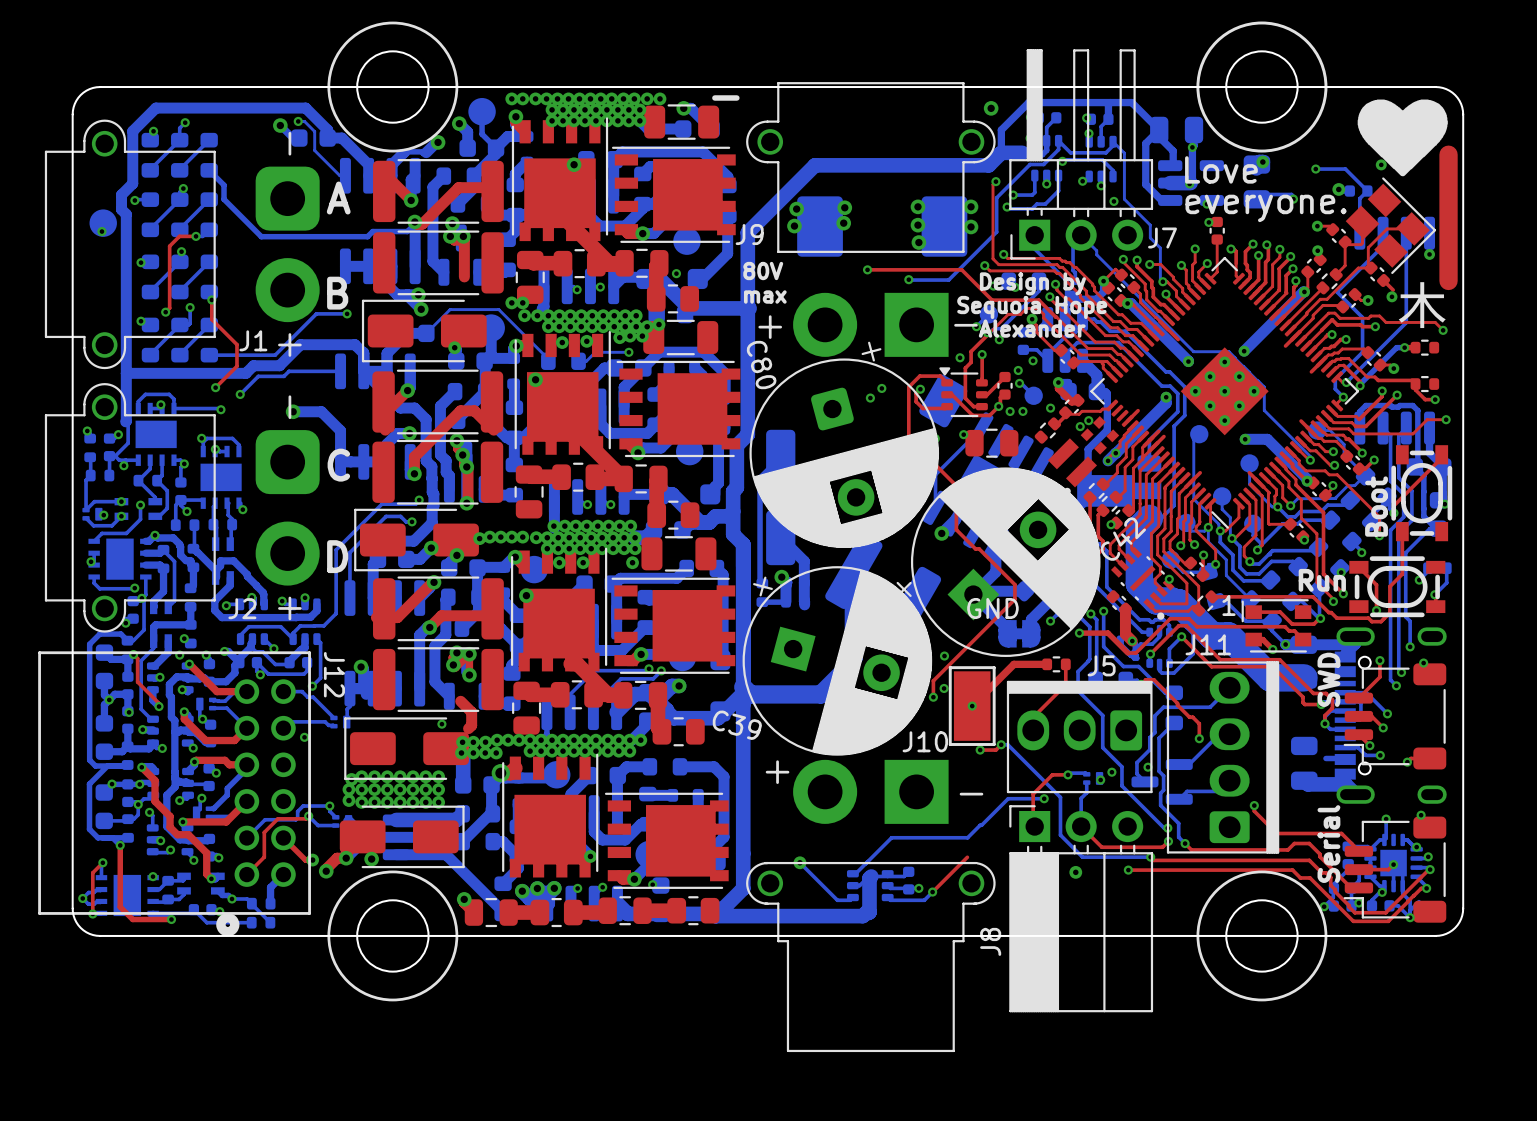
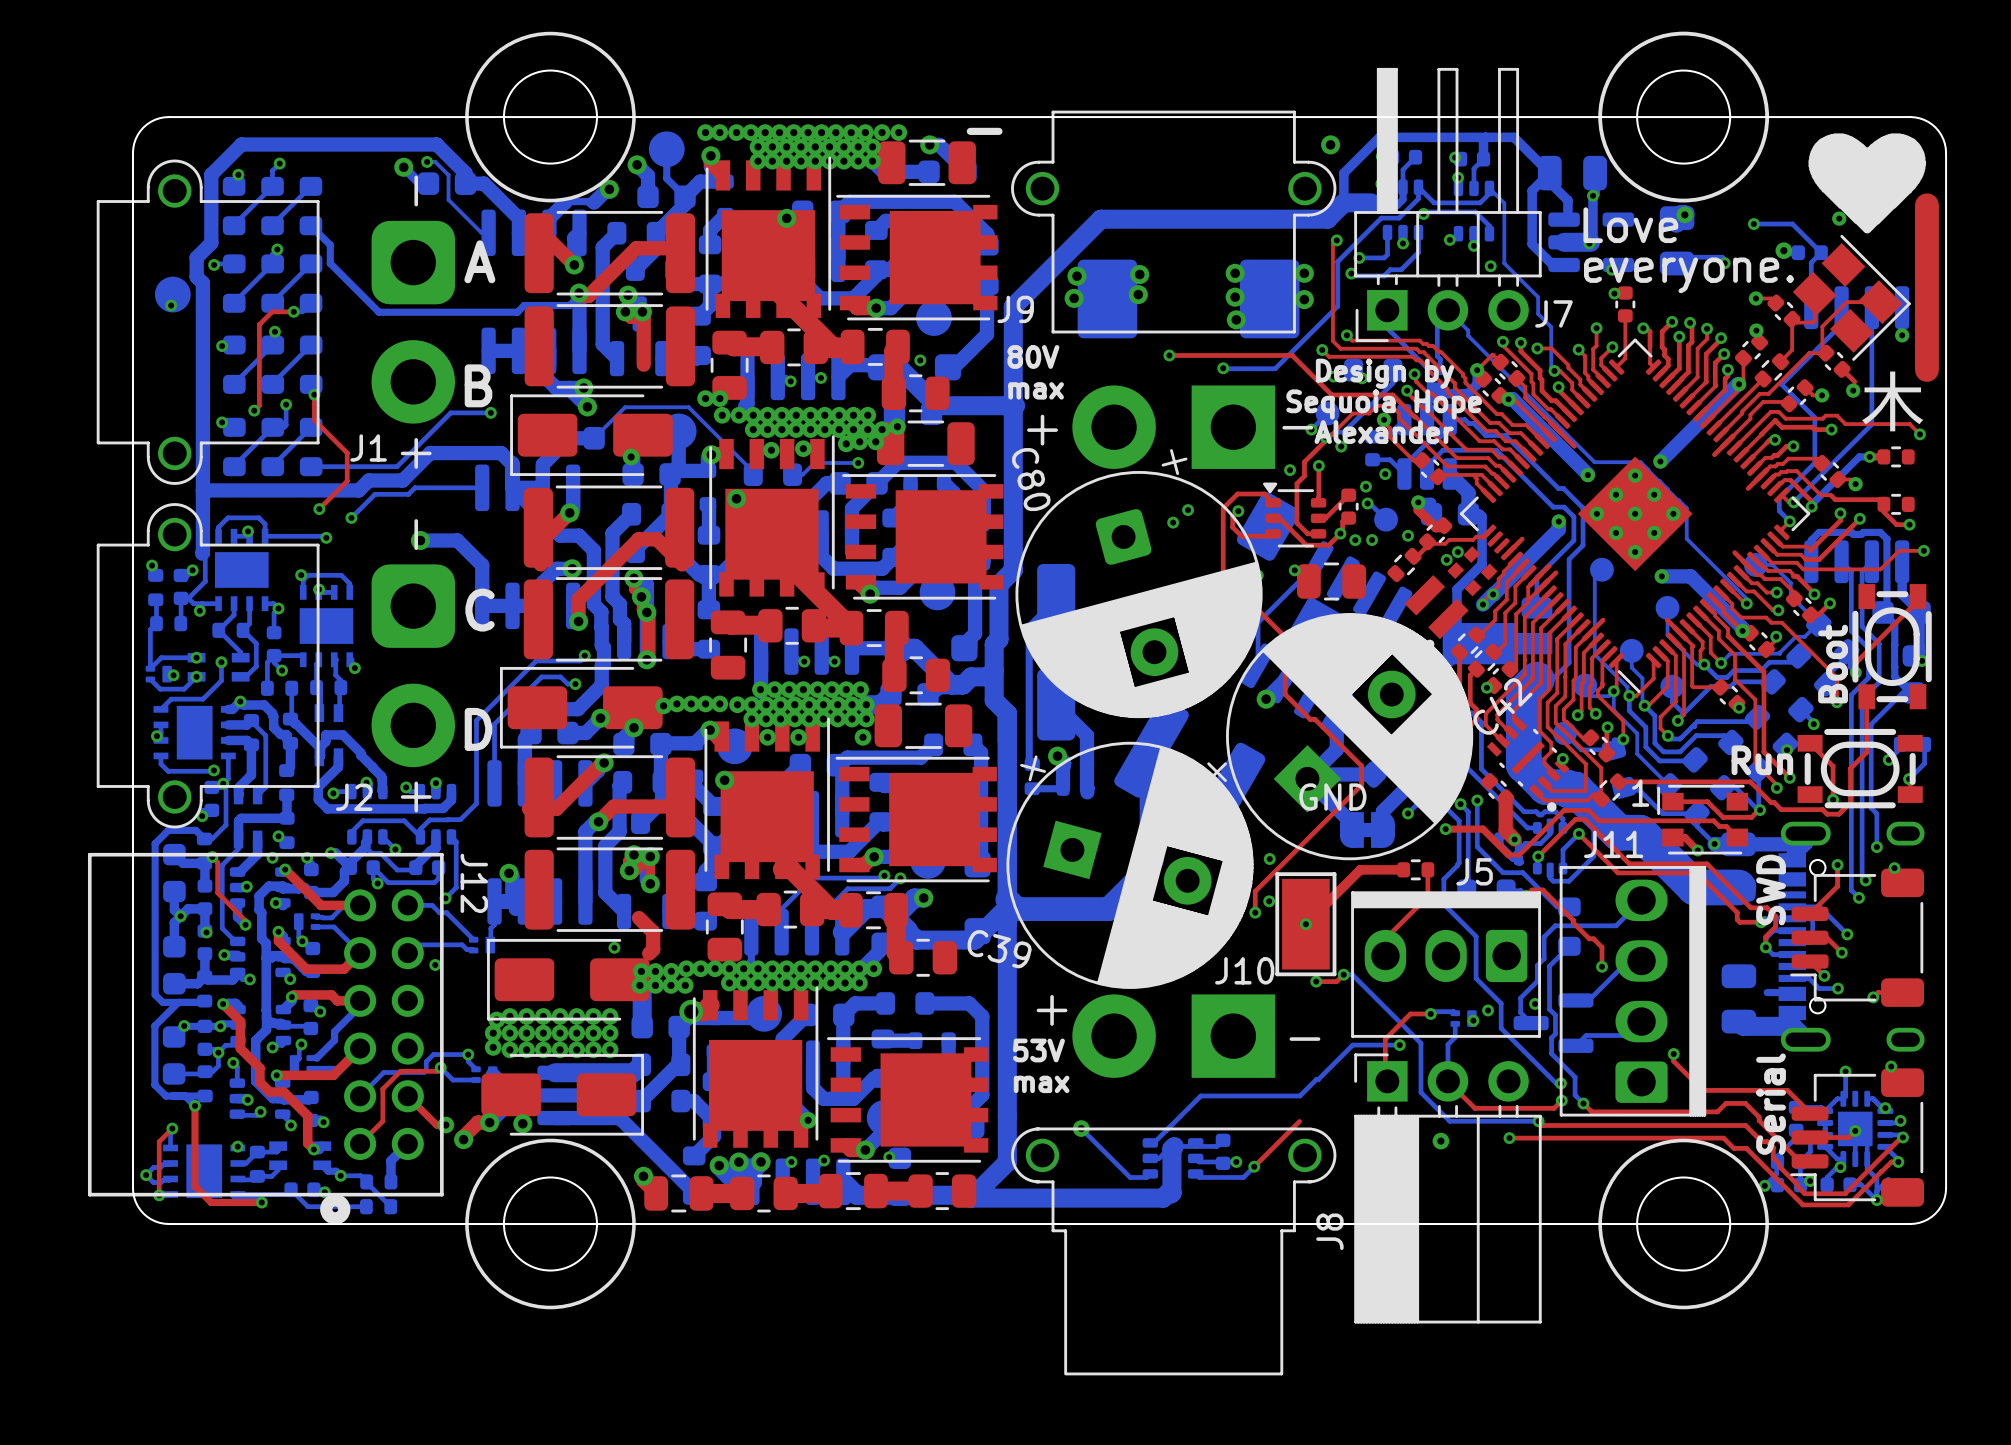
text: none -> 53V (1038, 1050)
text: none -> max (1041, 1084)

